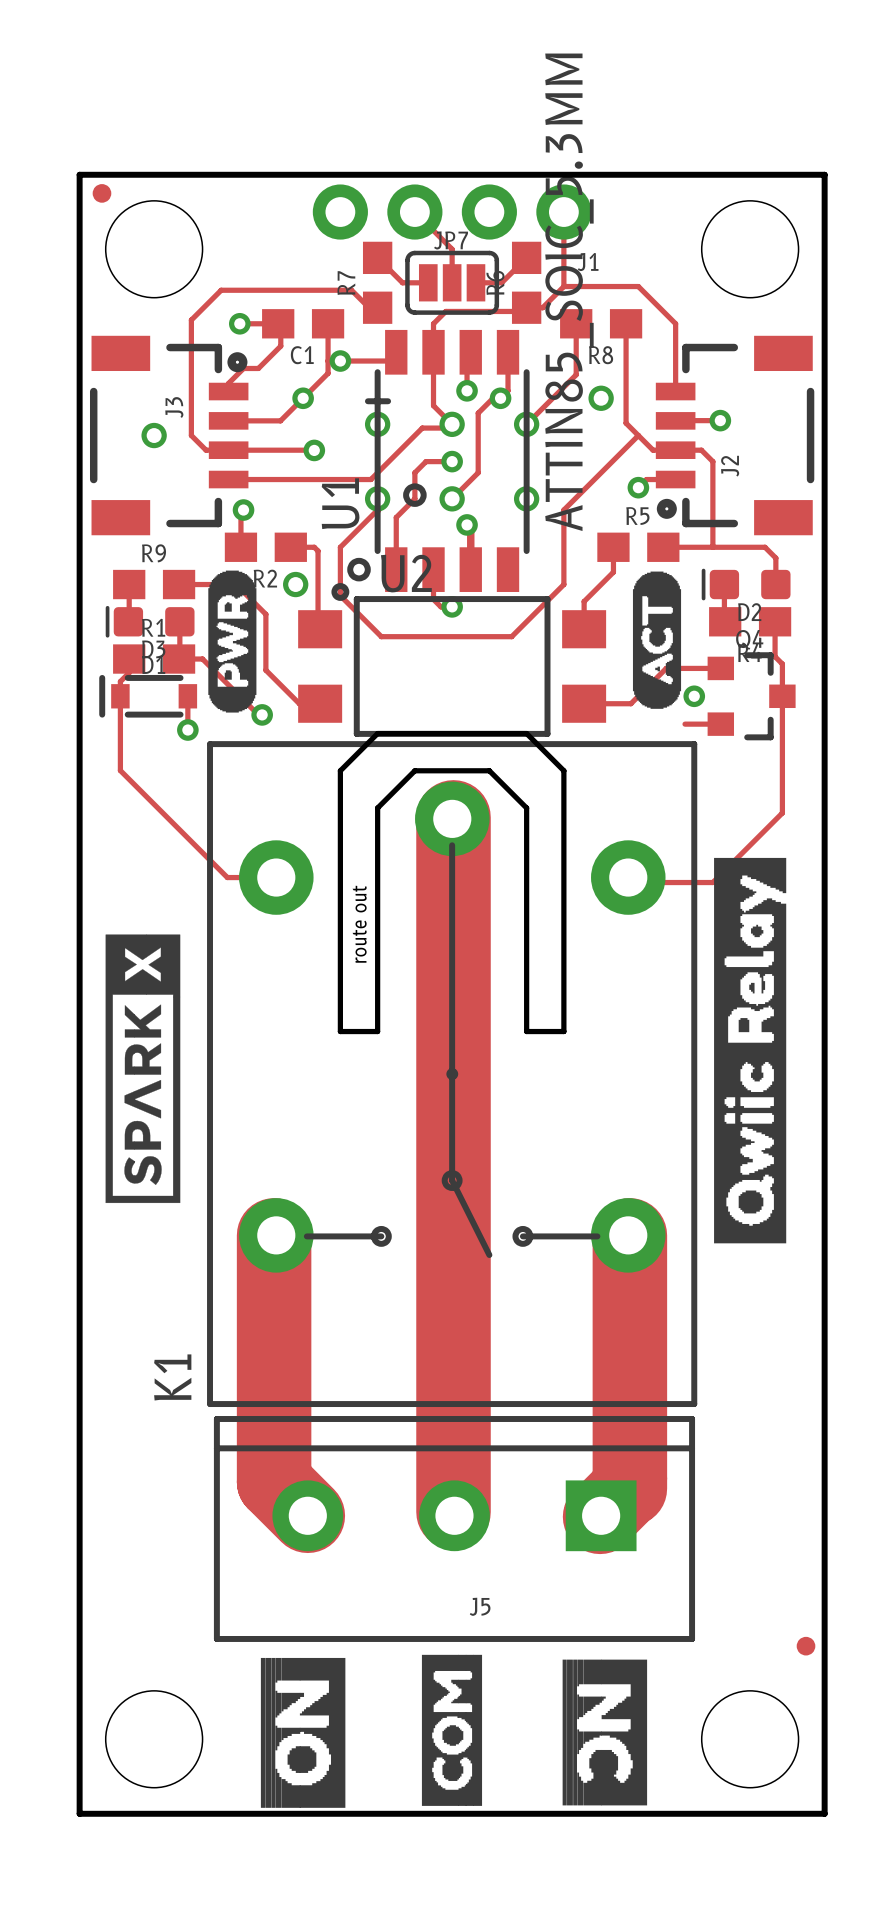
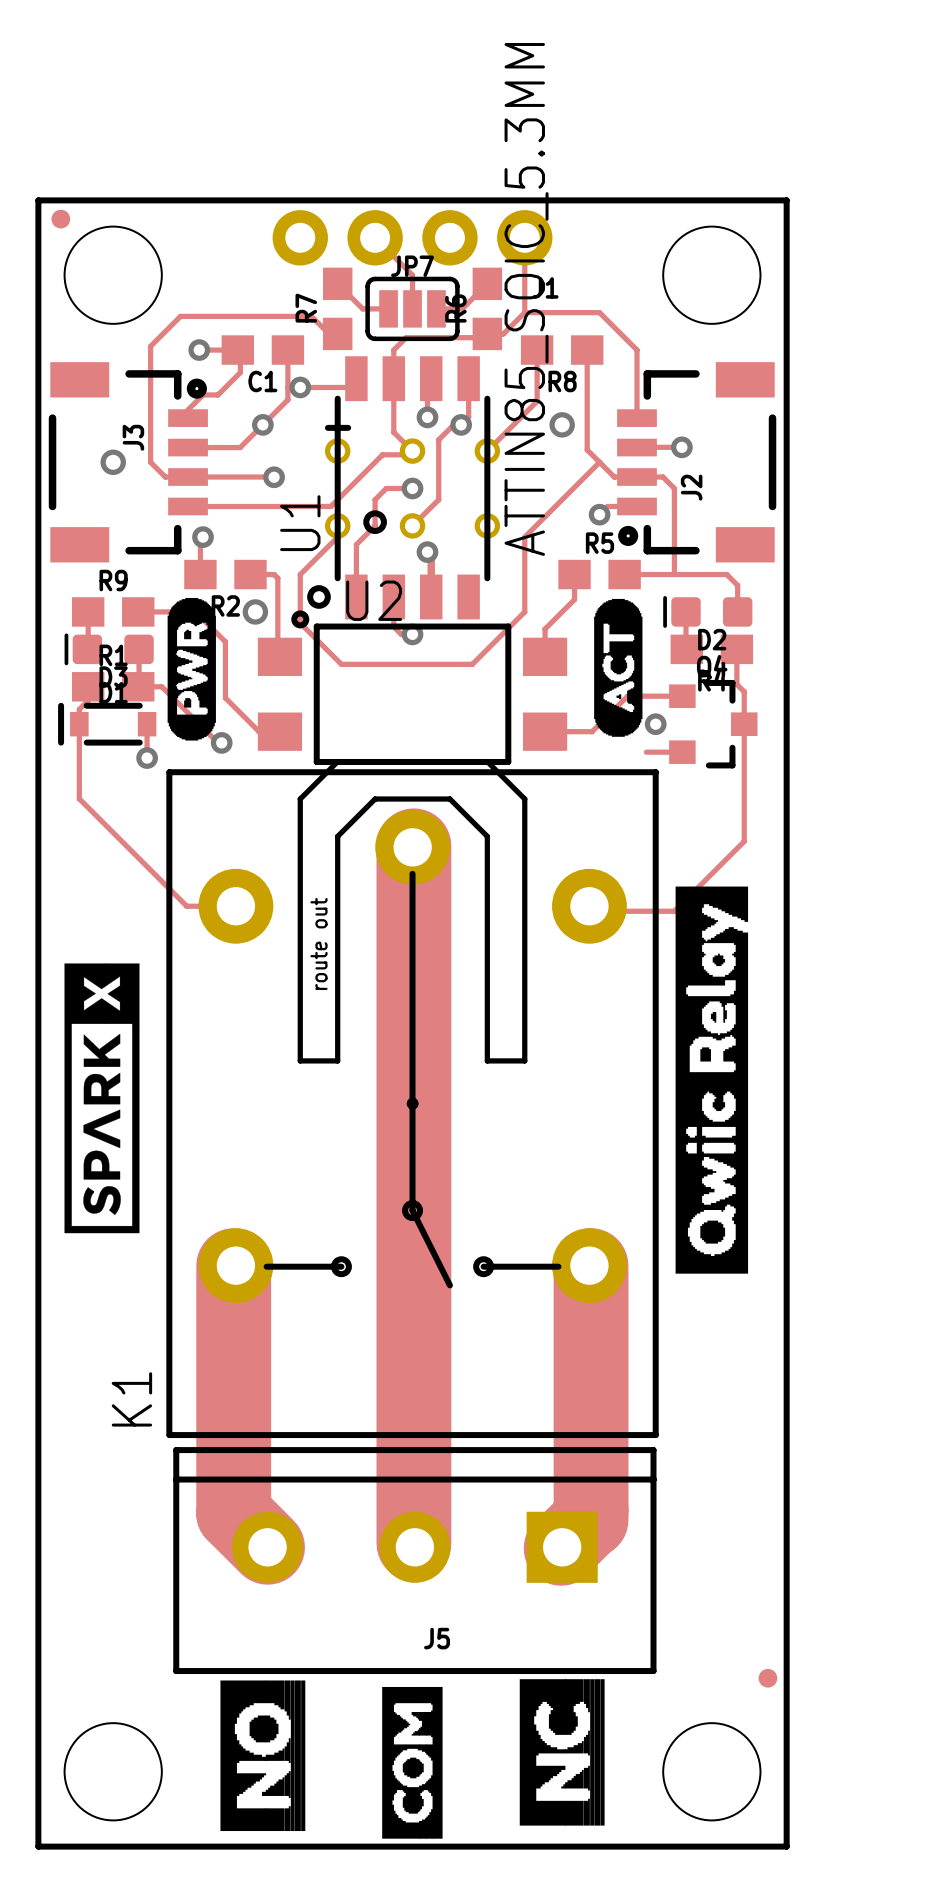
drawing shape: [260, 1657, 346, 1808] -> [220, 1680, 306, 1832]
drawing shape: [562, 1659, 648, 1806] -> [519, 1679, 605, 1826]

